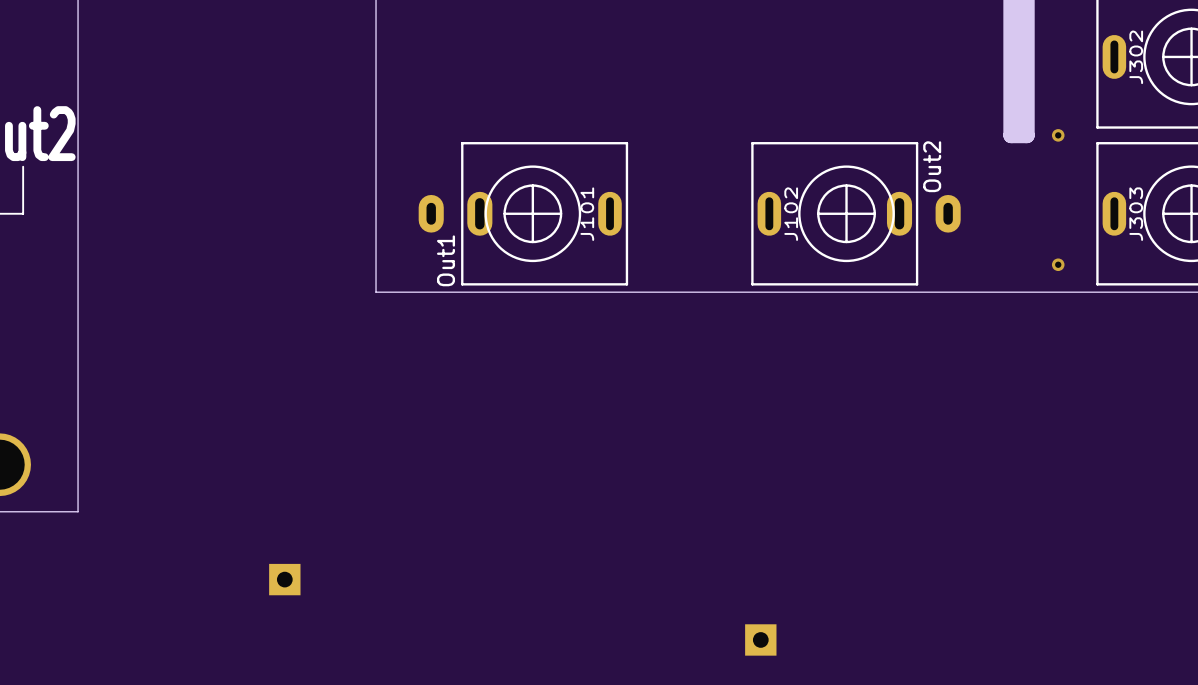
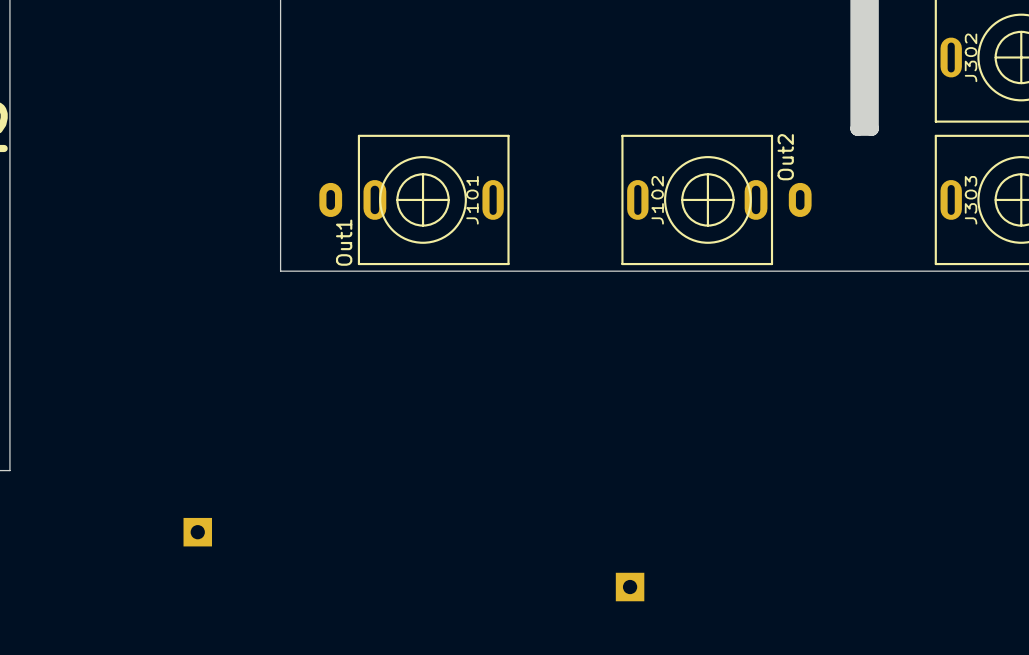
via: (1058, 135) -> none
via: (1058, 264) -> none

